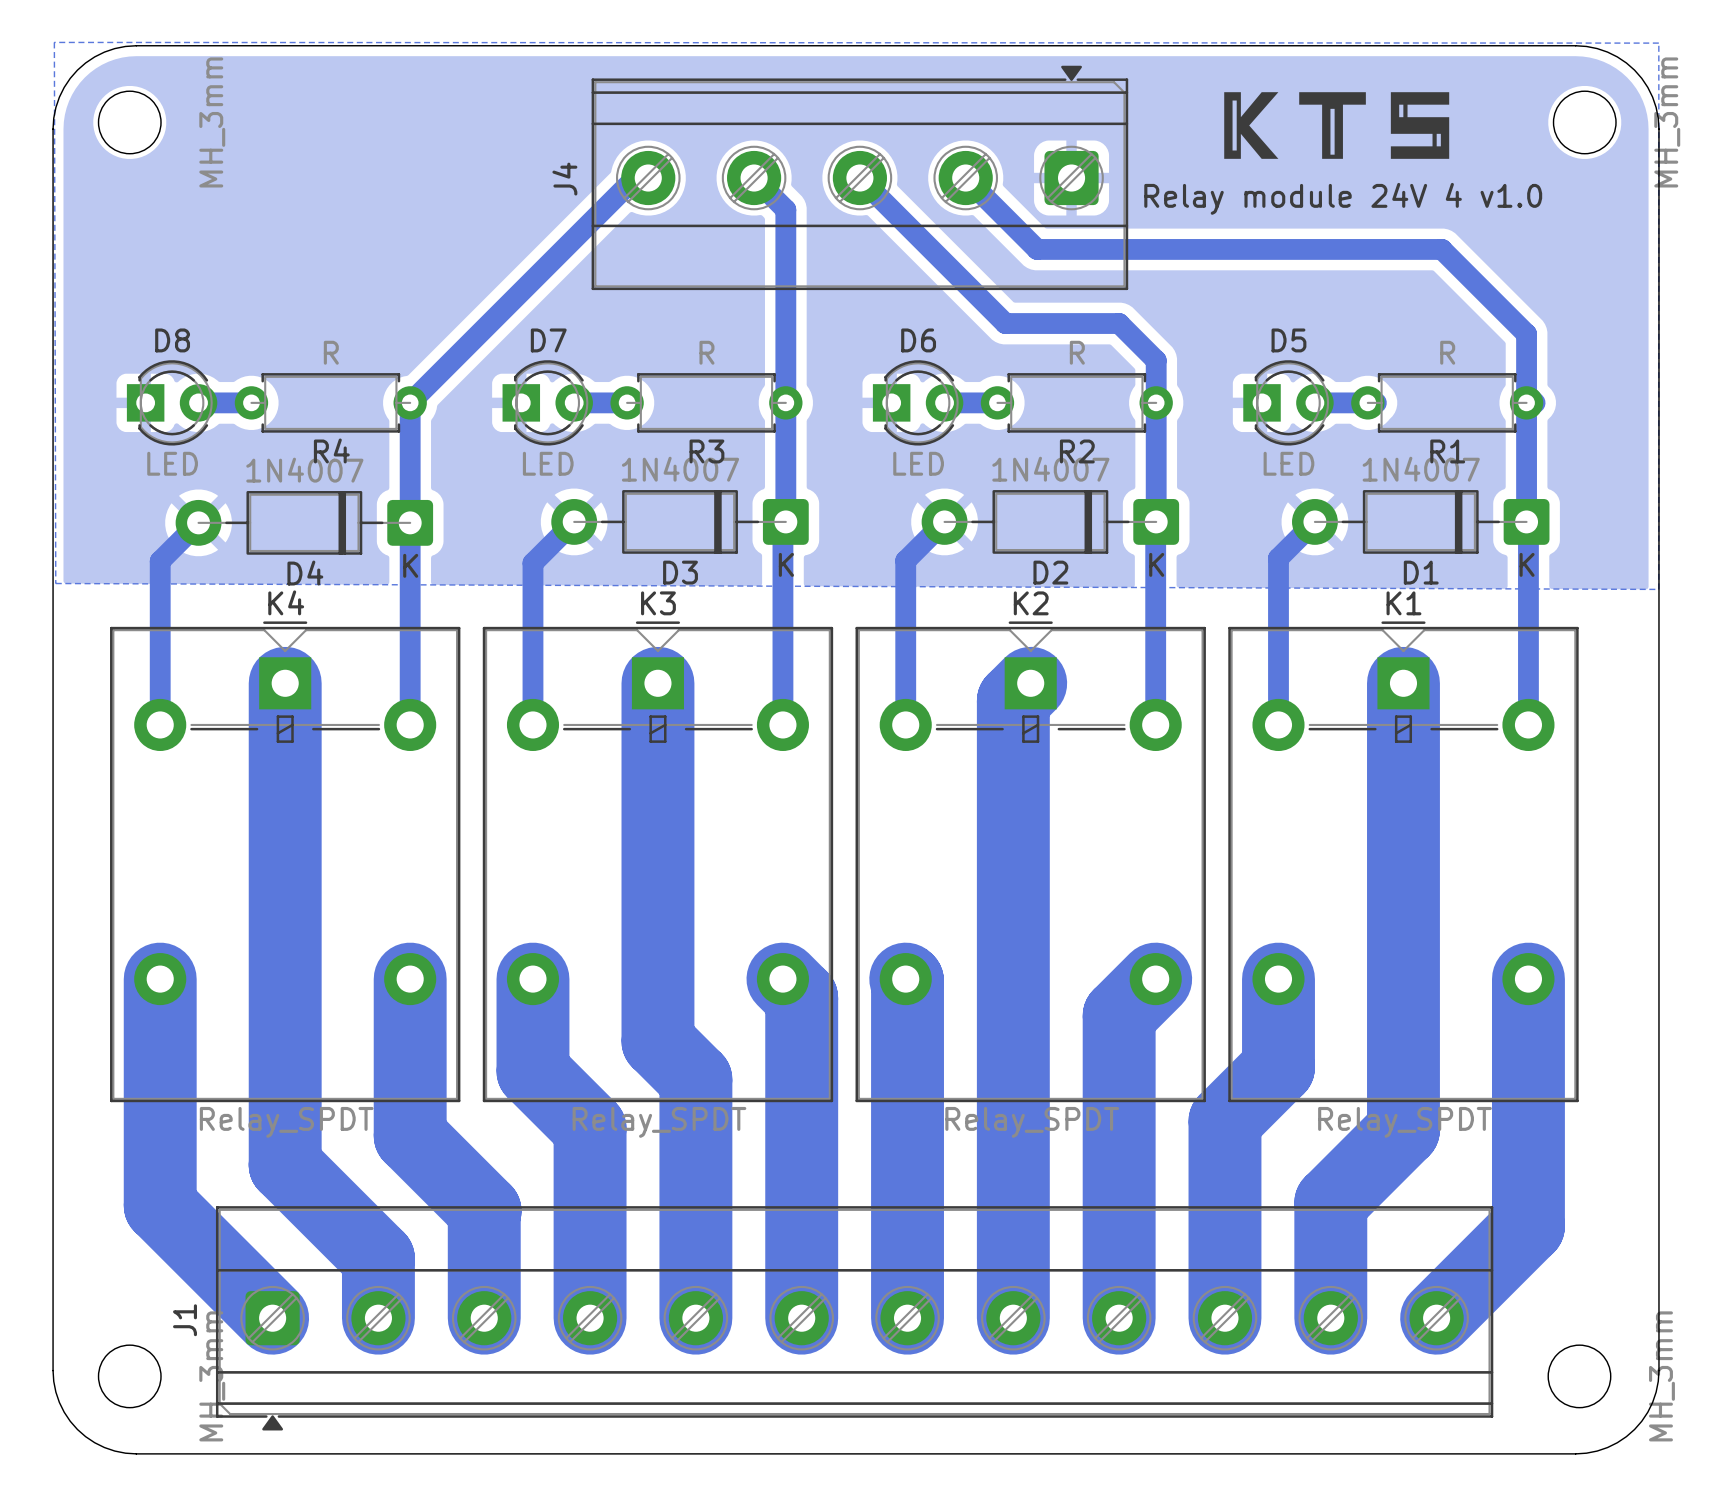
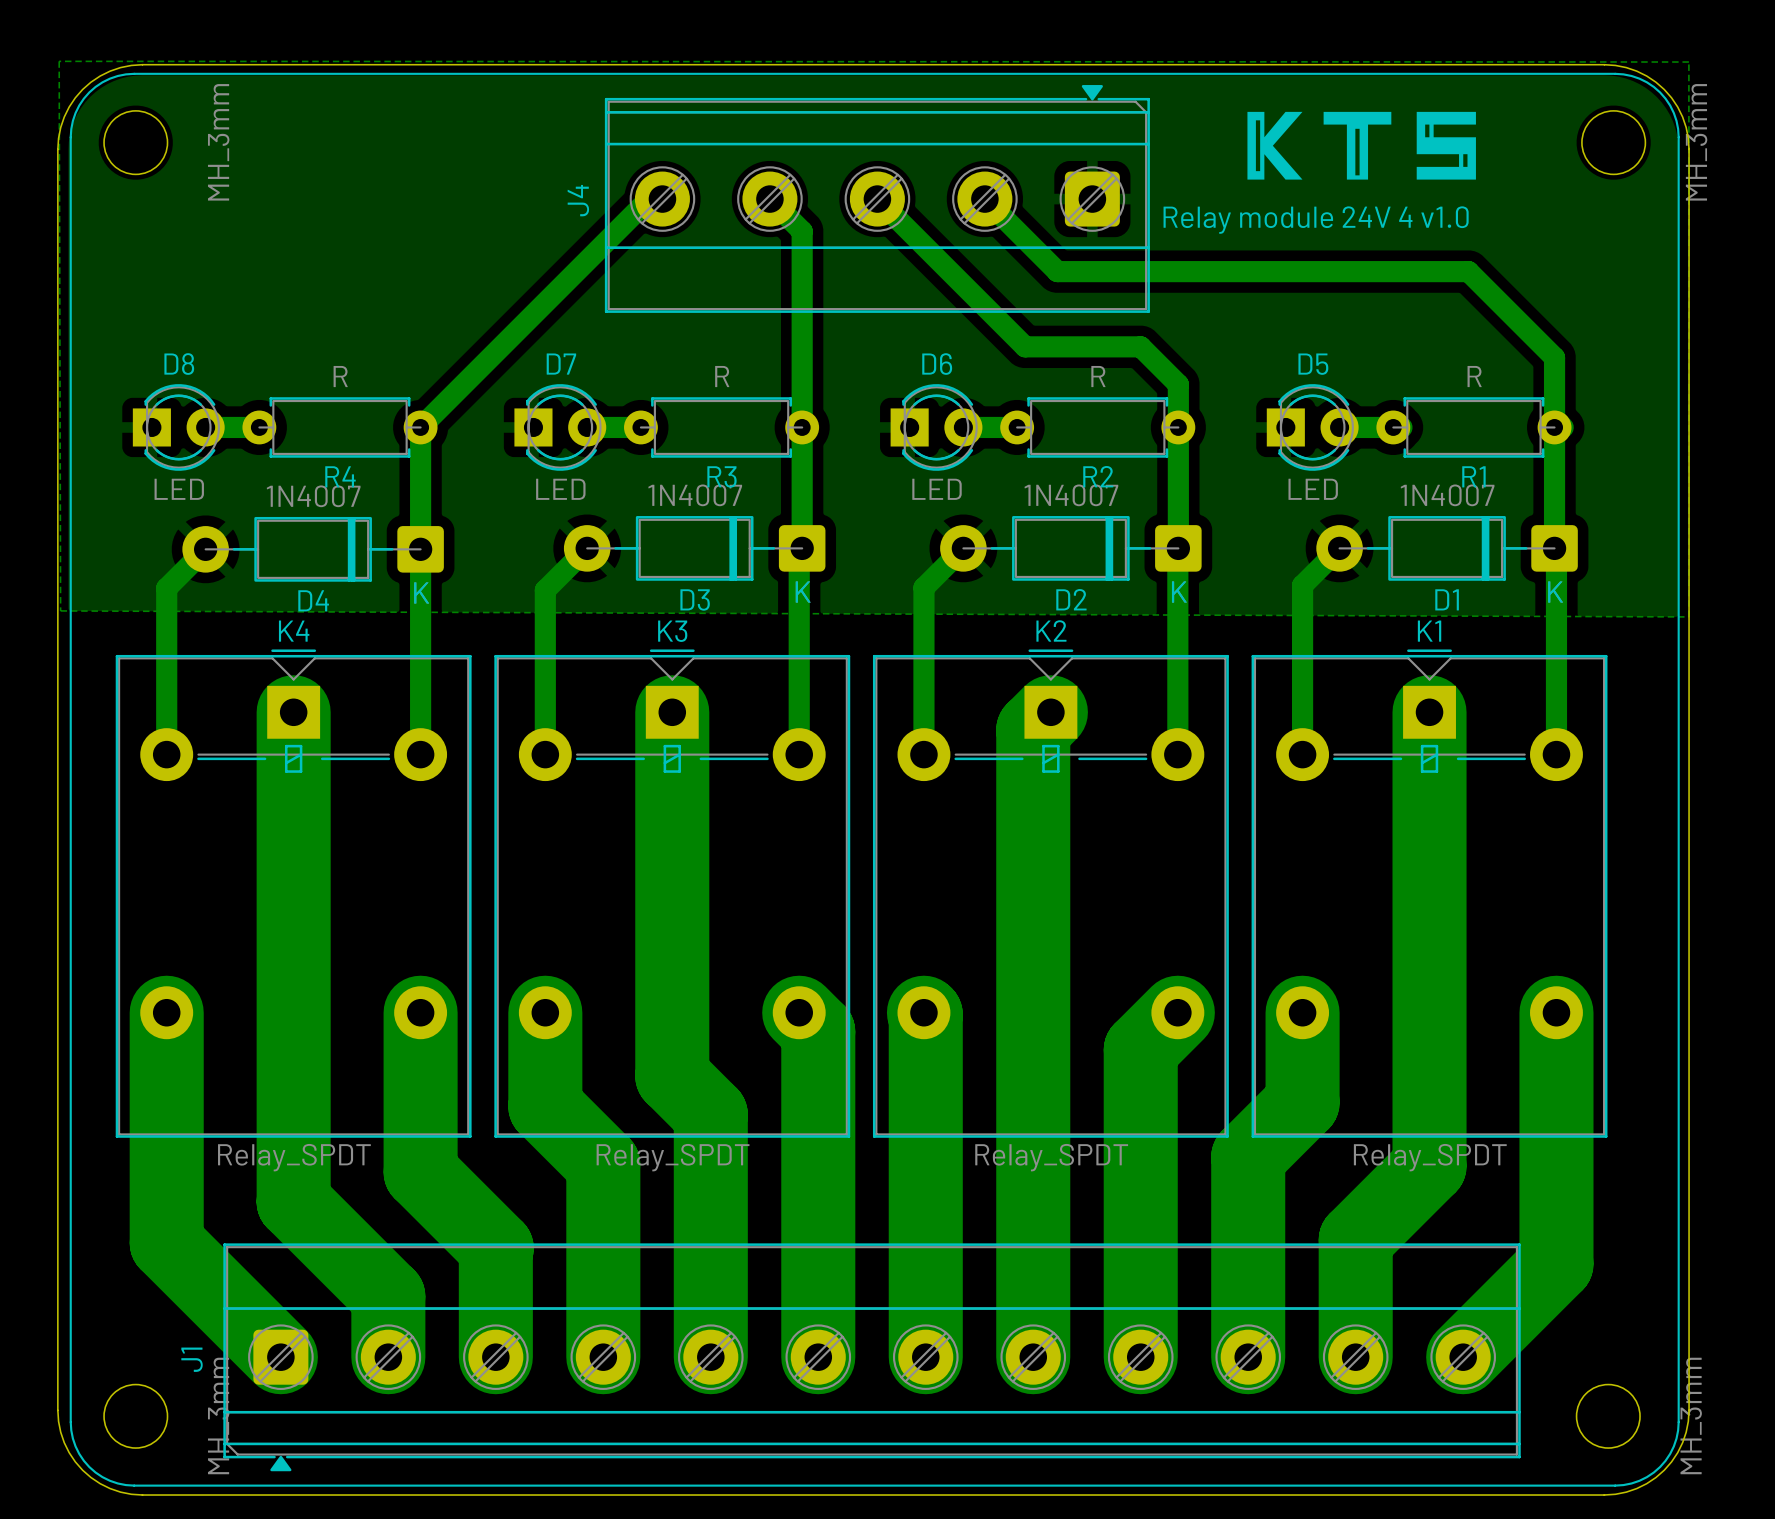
line: none -> (134, 73) (1615, 73) (1639, 78) (1660, 92) (1673, 113) (1678, 137) (1678, 1422) (1673, 1446) (1660, 1467) (1639, 1480) (1615, 1485) (134, 1485) (109, 1480) (89, 1467) (75, 1446) (70, 1422) (70, 137) (75, 113) (89, 92) (109, 78) (134, 73)

